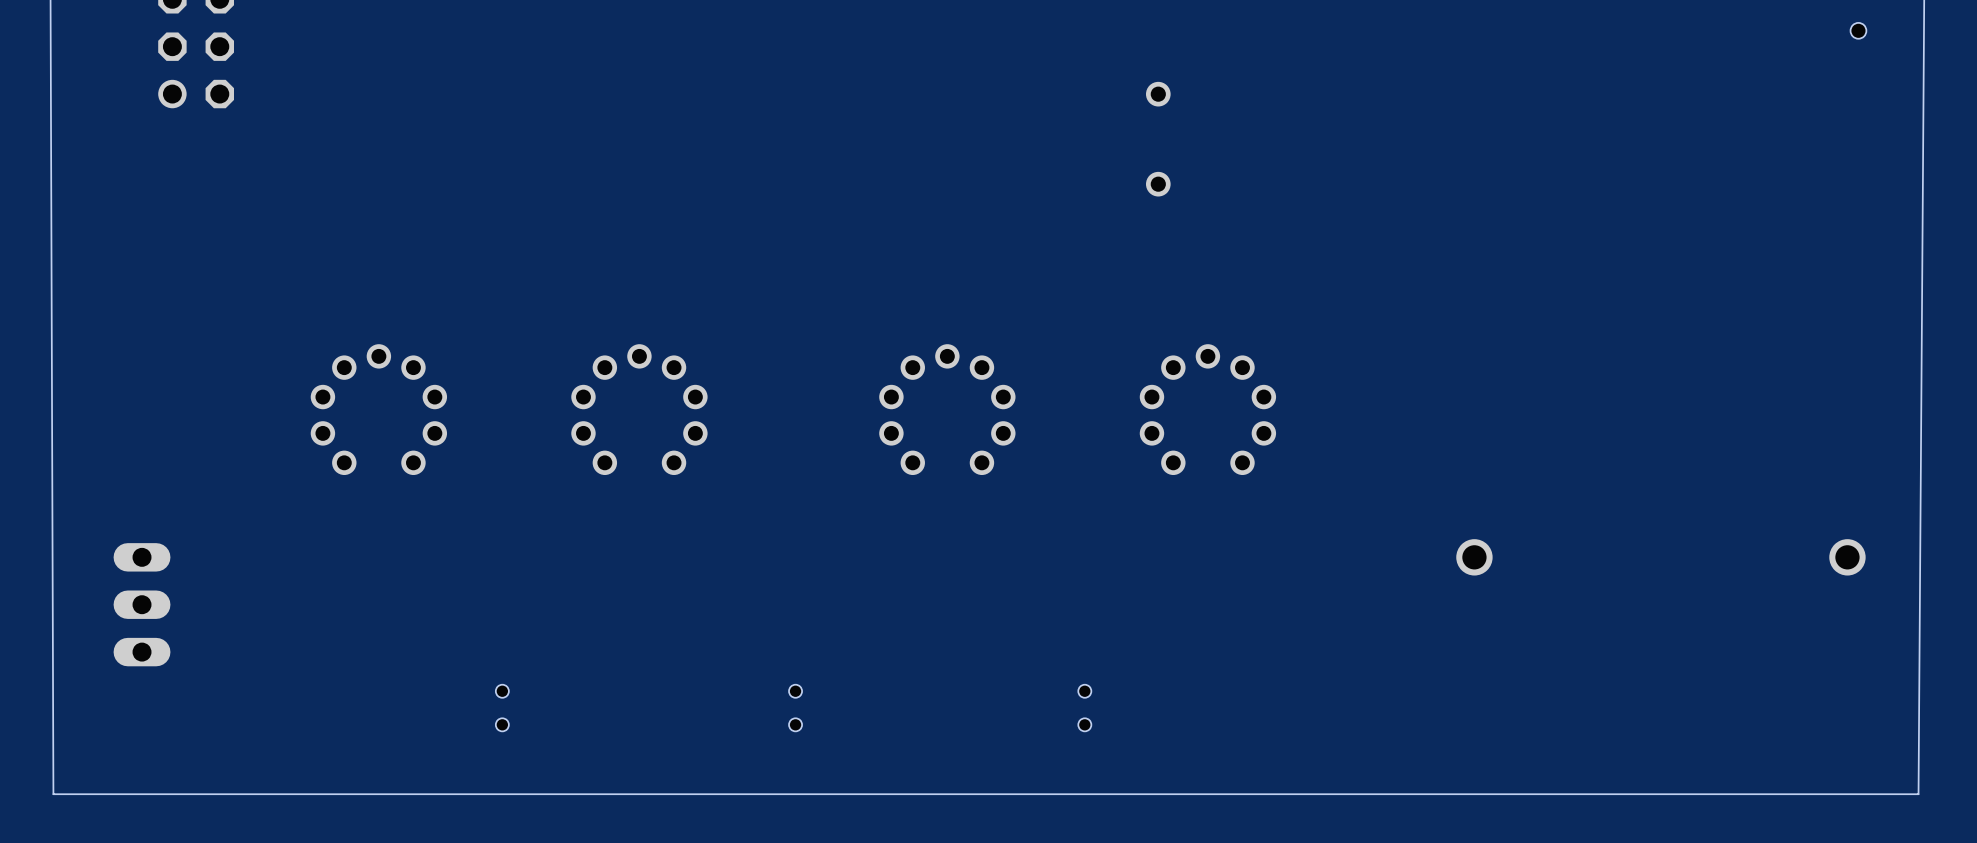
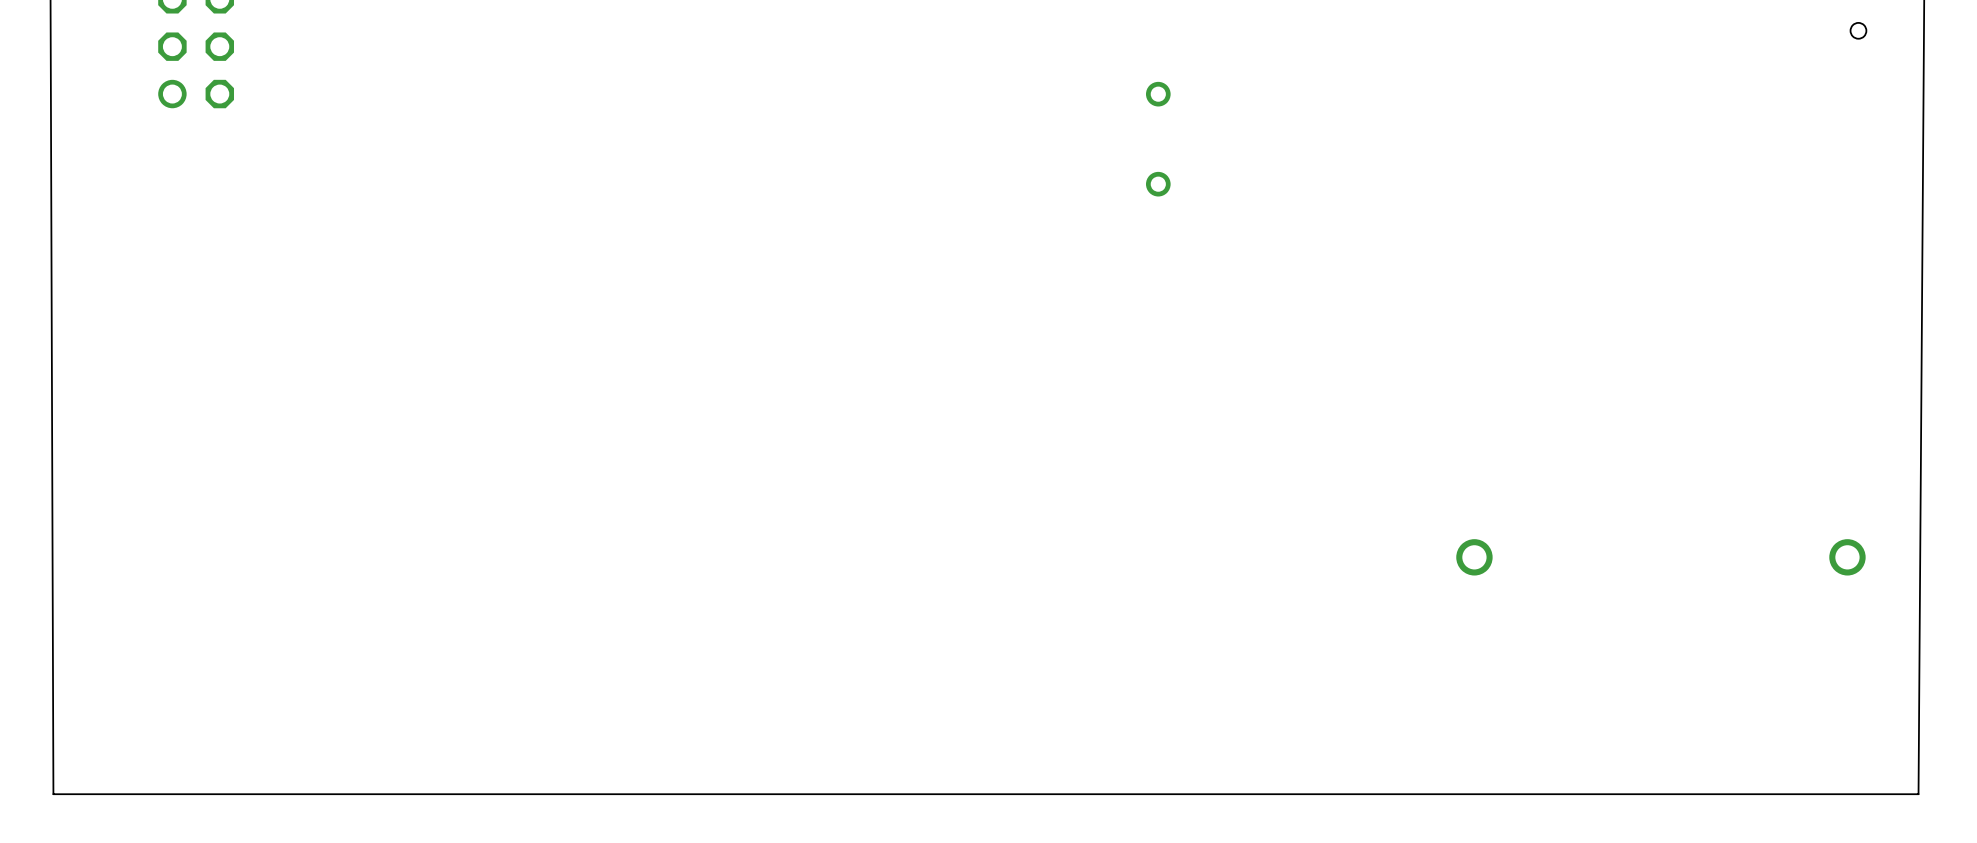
part: (378, 409) -> none
part: (639, 409) -> none
part: (947, 409) -> none
part: (1207, 409) -> none
part: (142, 604) -> none
part: (502, 708) -> none
part: (795, 708) -> none
part: (1084, 708) -> none

